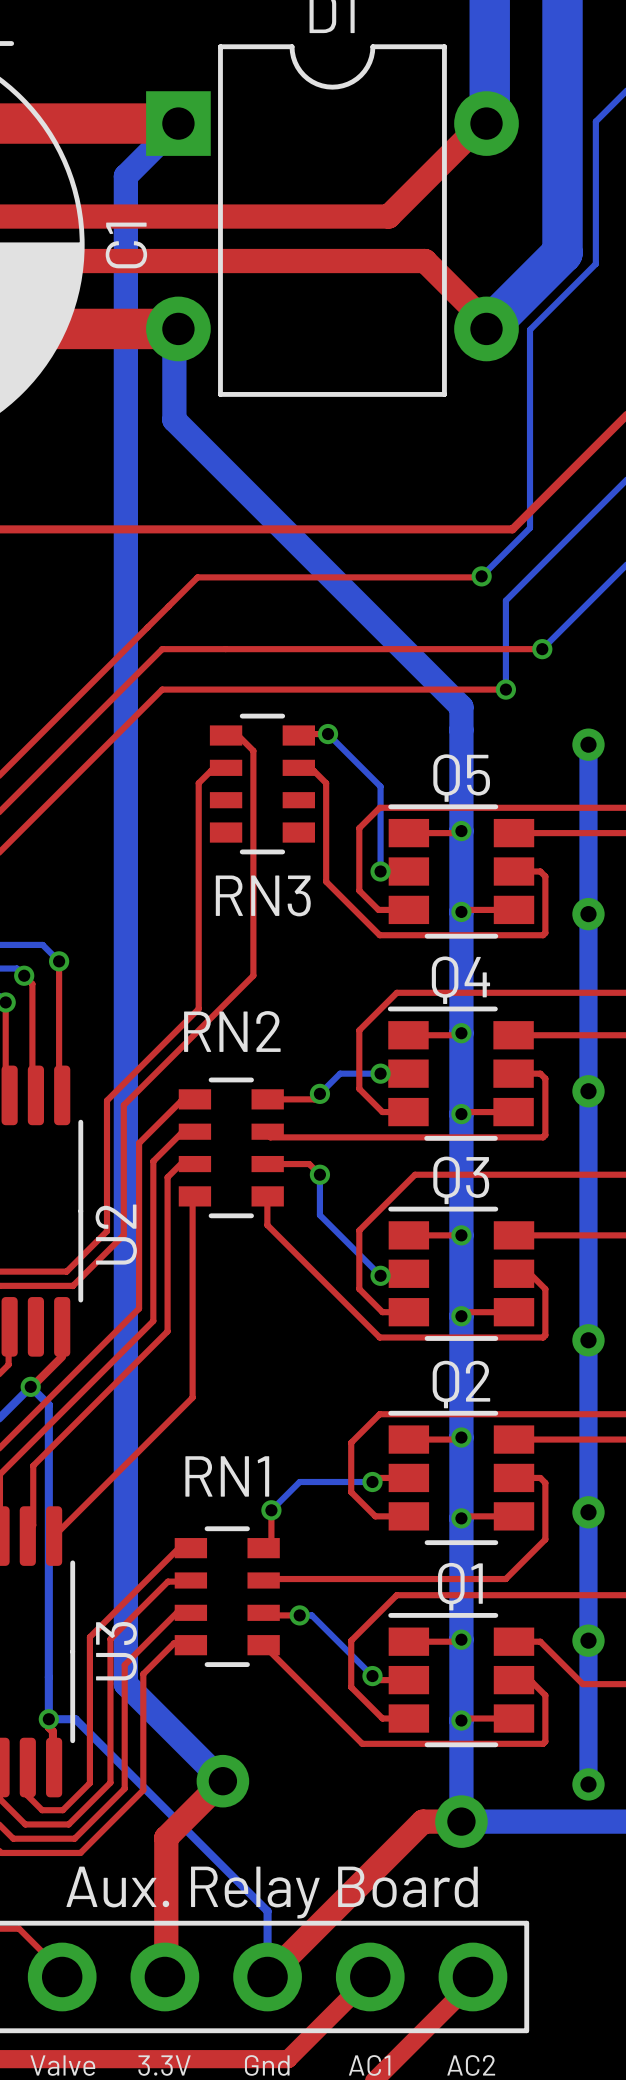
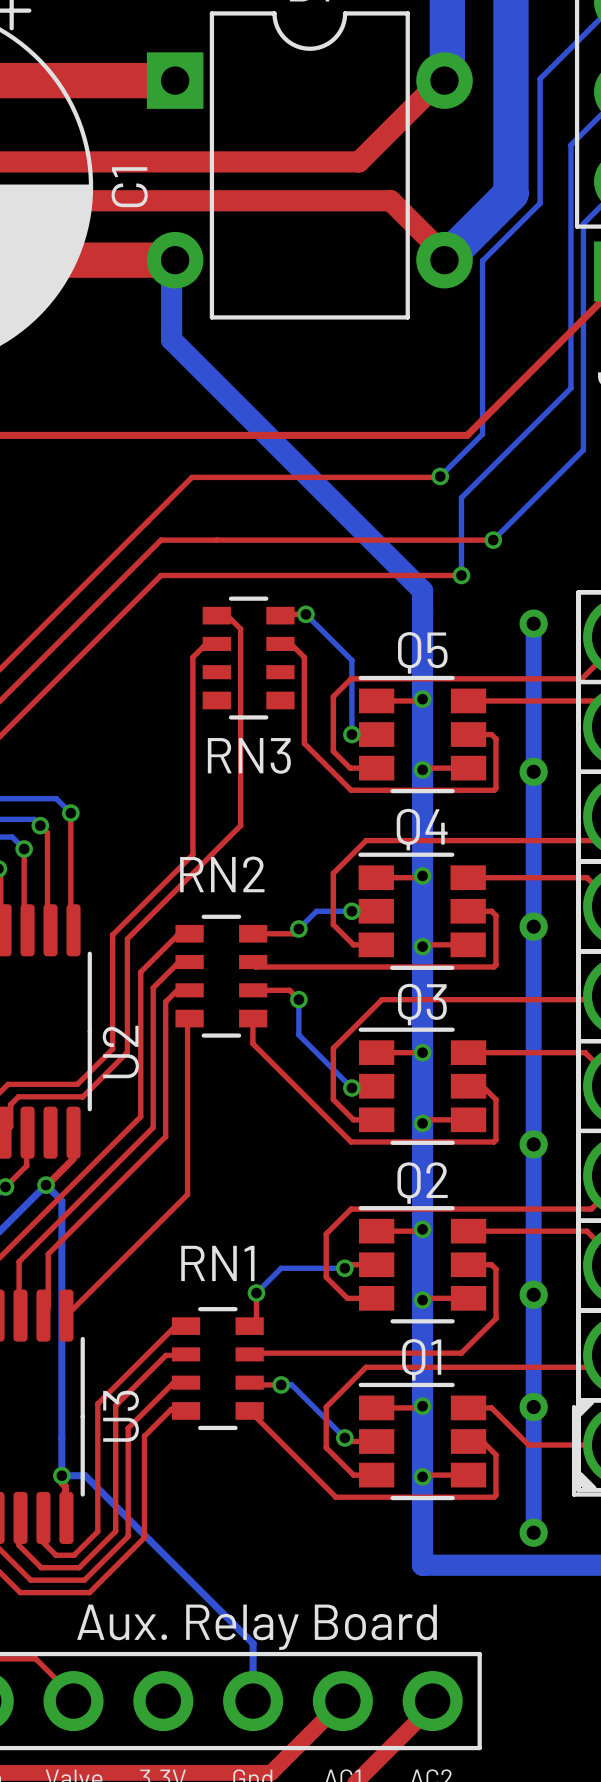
bottom track: (178, 123) (125, 176) (125, 1684) (222, 1781) -> none
top track: (222, 1781) (166, 1837) (166, 1979) -> none
via: (222, 1781) -> none
top track: (461, 1821) (422, 1821) (267, 1976) -> none
via: (461, 1821) -> none

